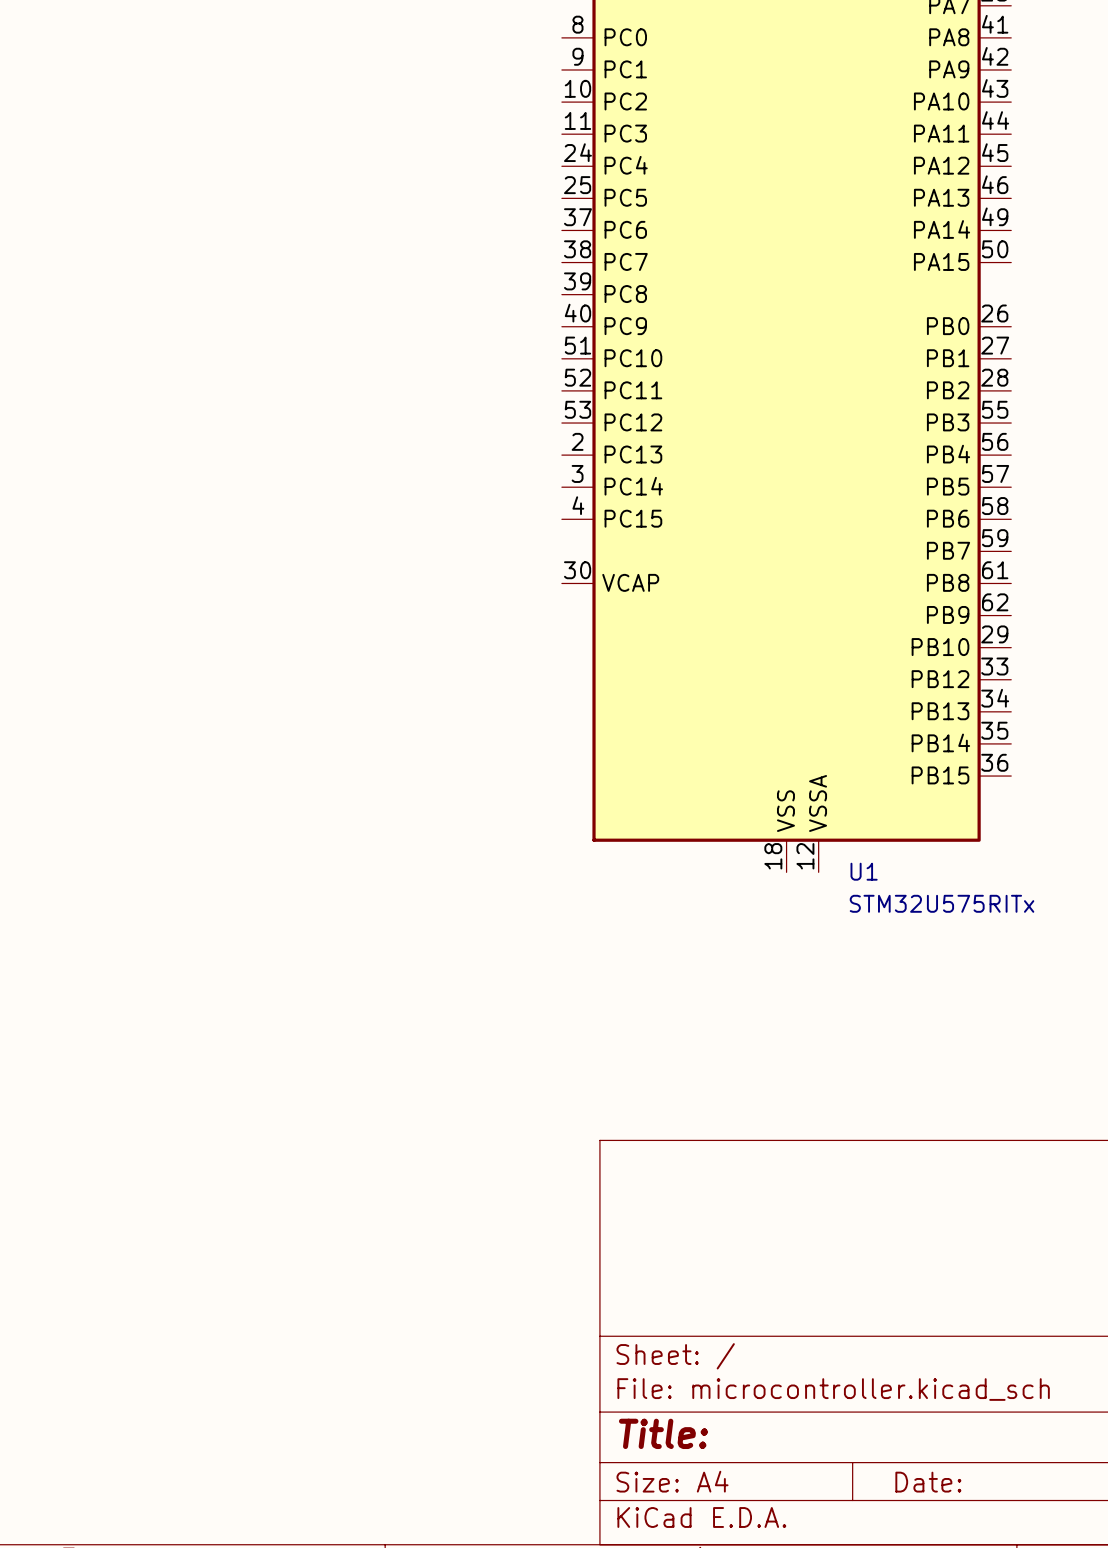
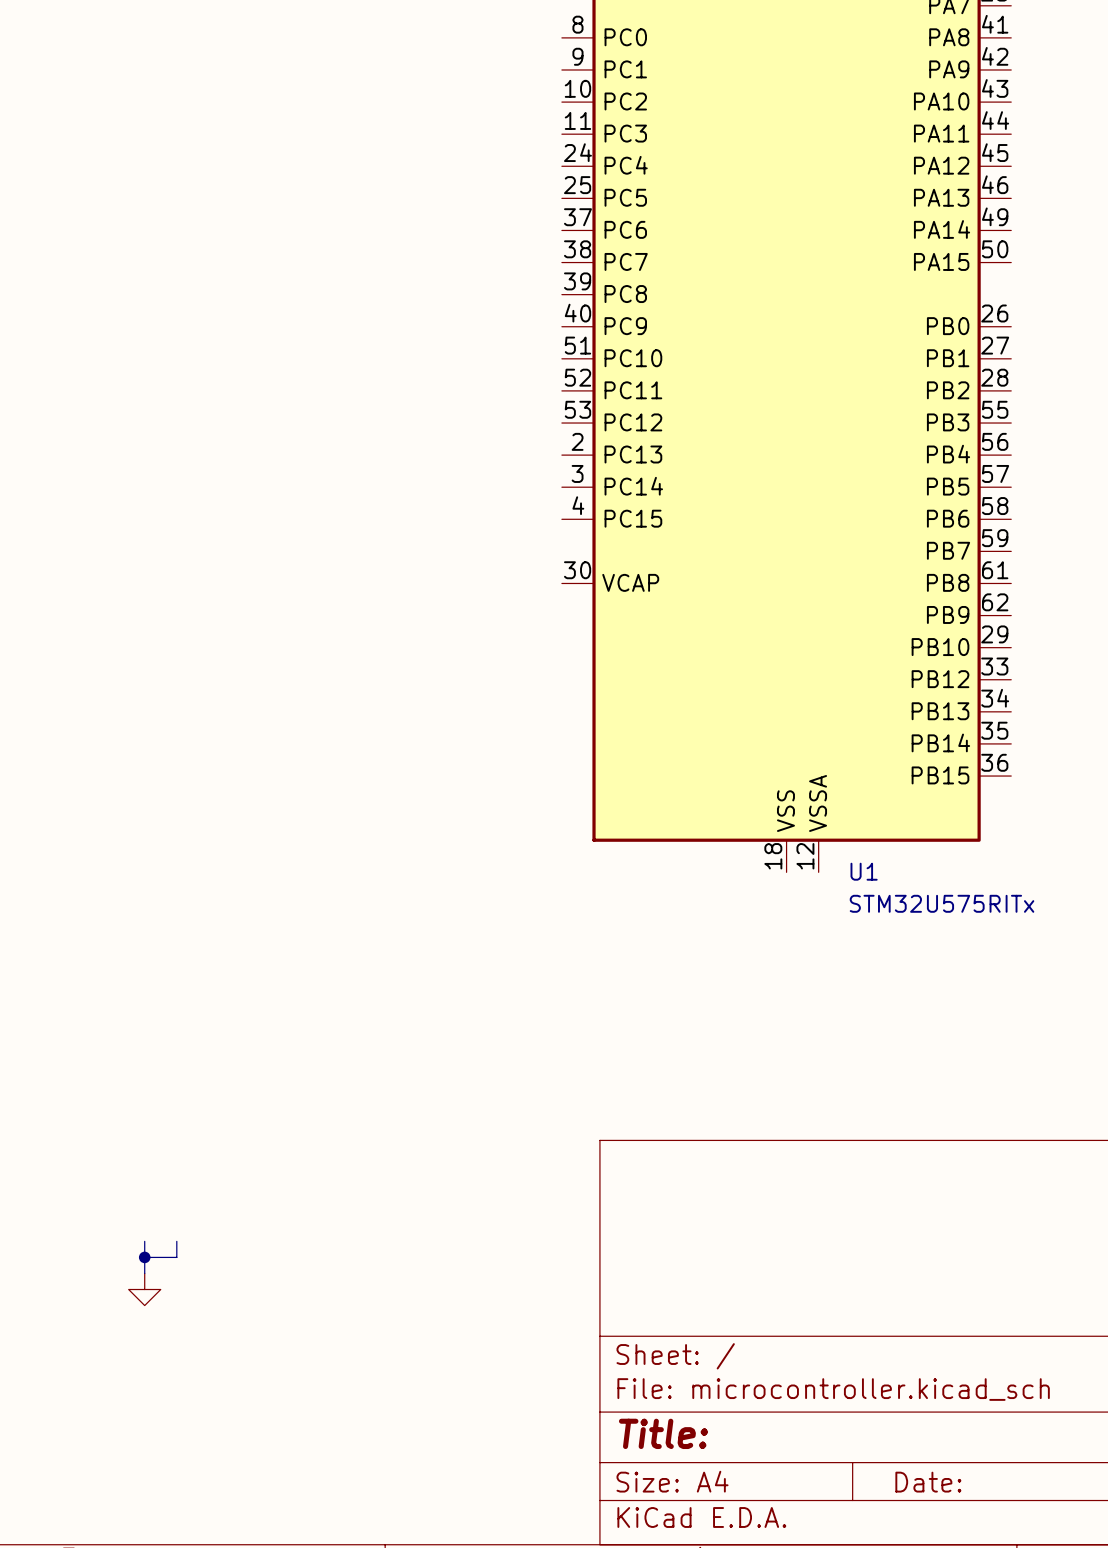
wire: none -> (144, 1241) (144, 1273)
wire: none -> (176, 1241) (176, 1257) (144, 1257)
junction: none -> (144, 1257)
power symbol: none -> (144, 1289)

